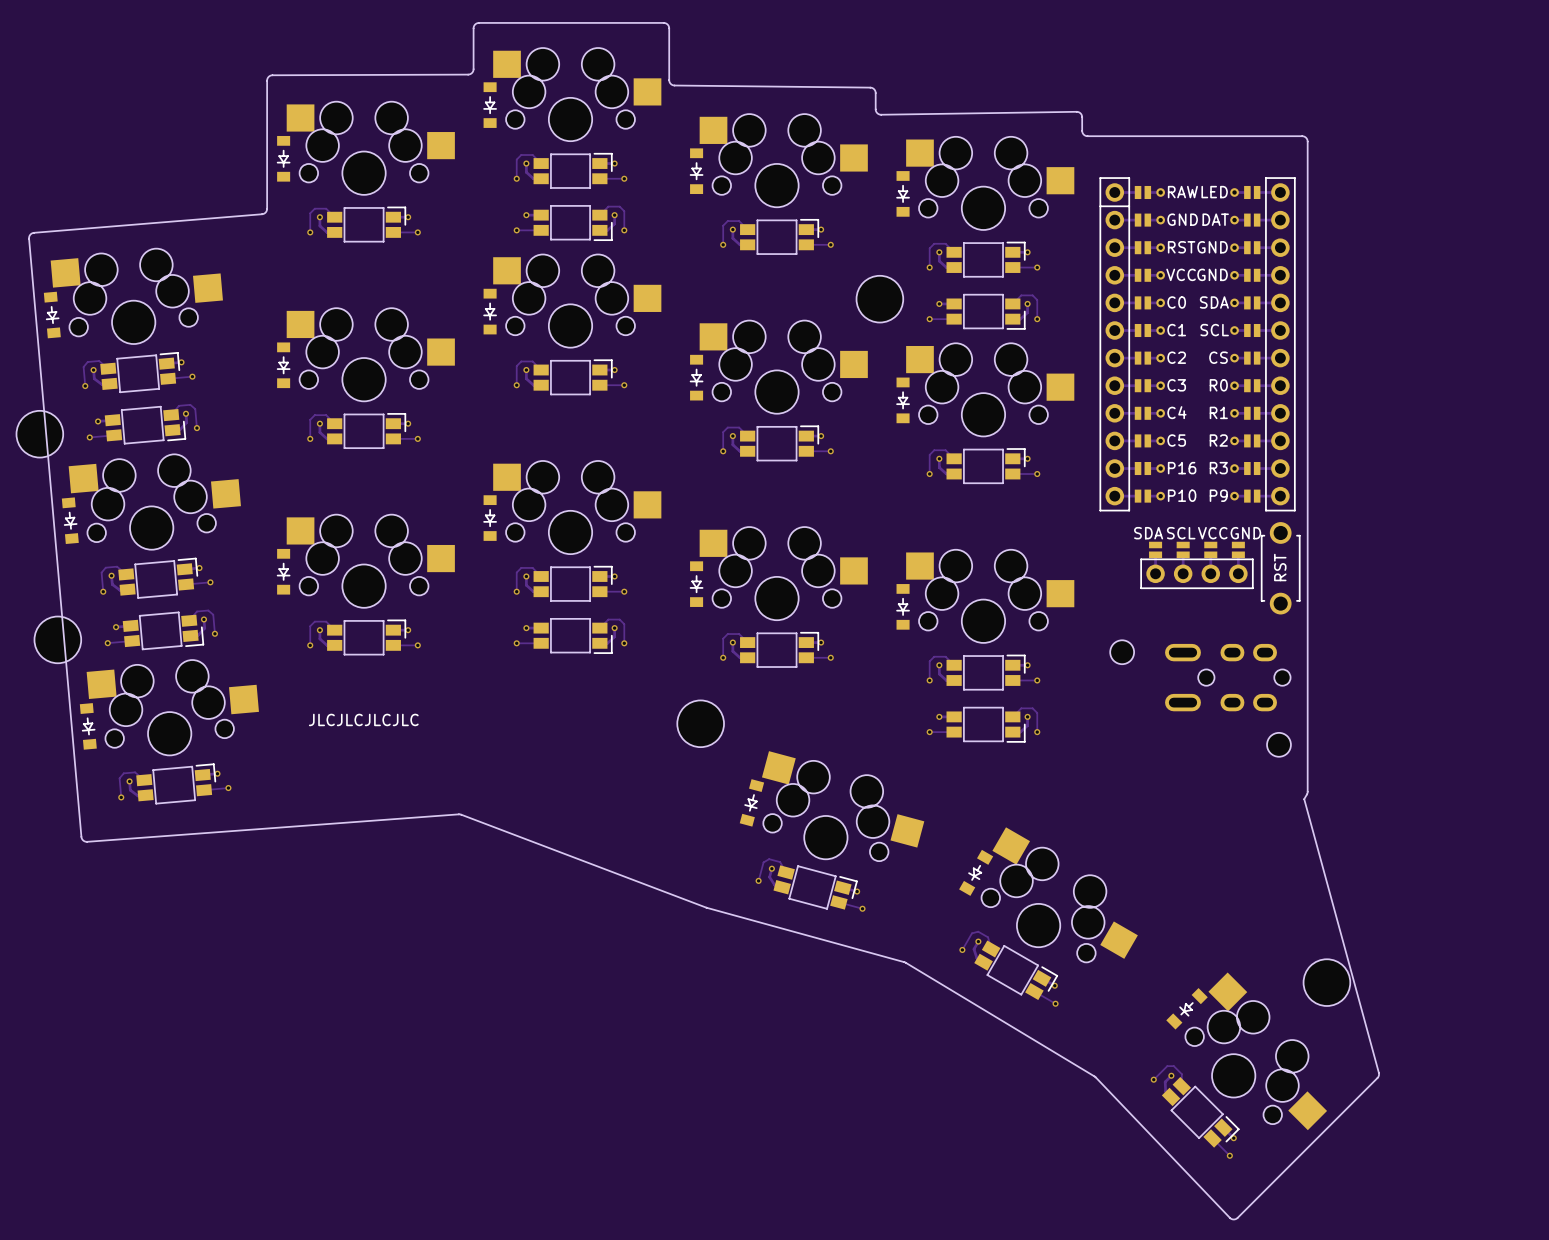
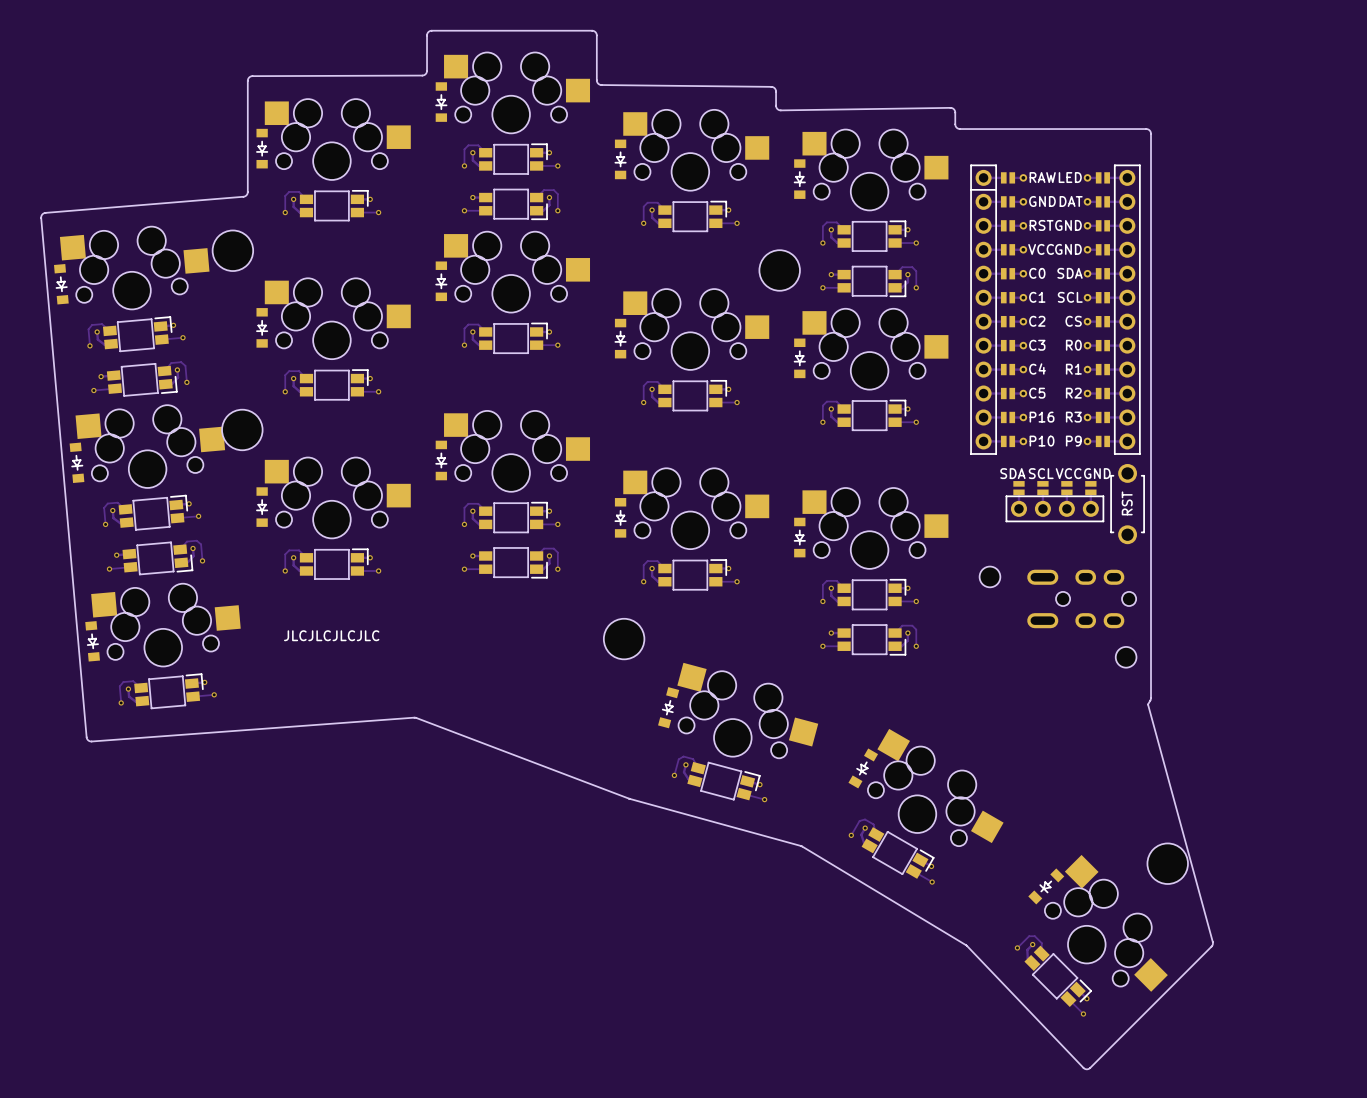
part: none -> (232, 250)
part: (39, 434) -> none
part: none -> (242, 429)
part: (57, 639) -> none

